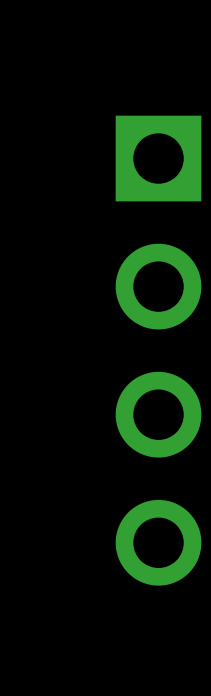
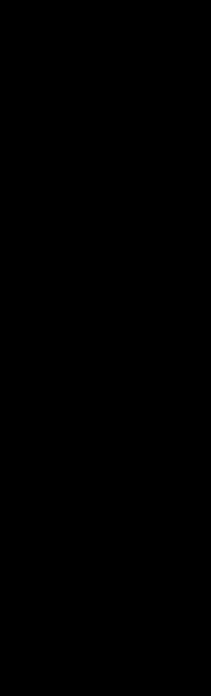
part: (158, 350) -> none

